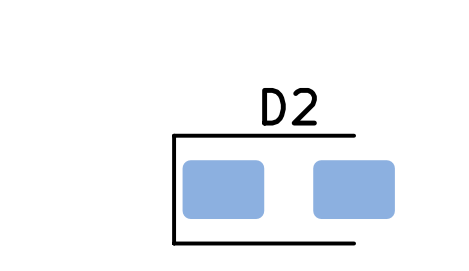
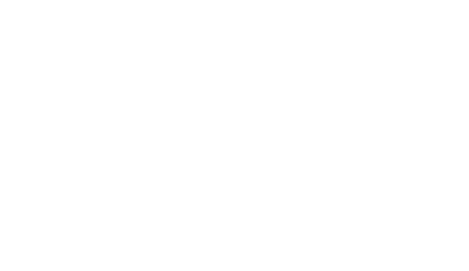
D2: (283, 189) -> none

